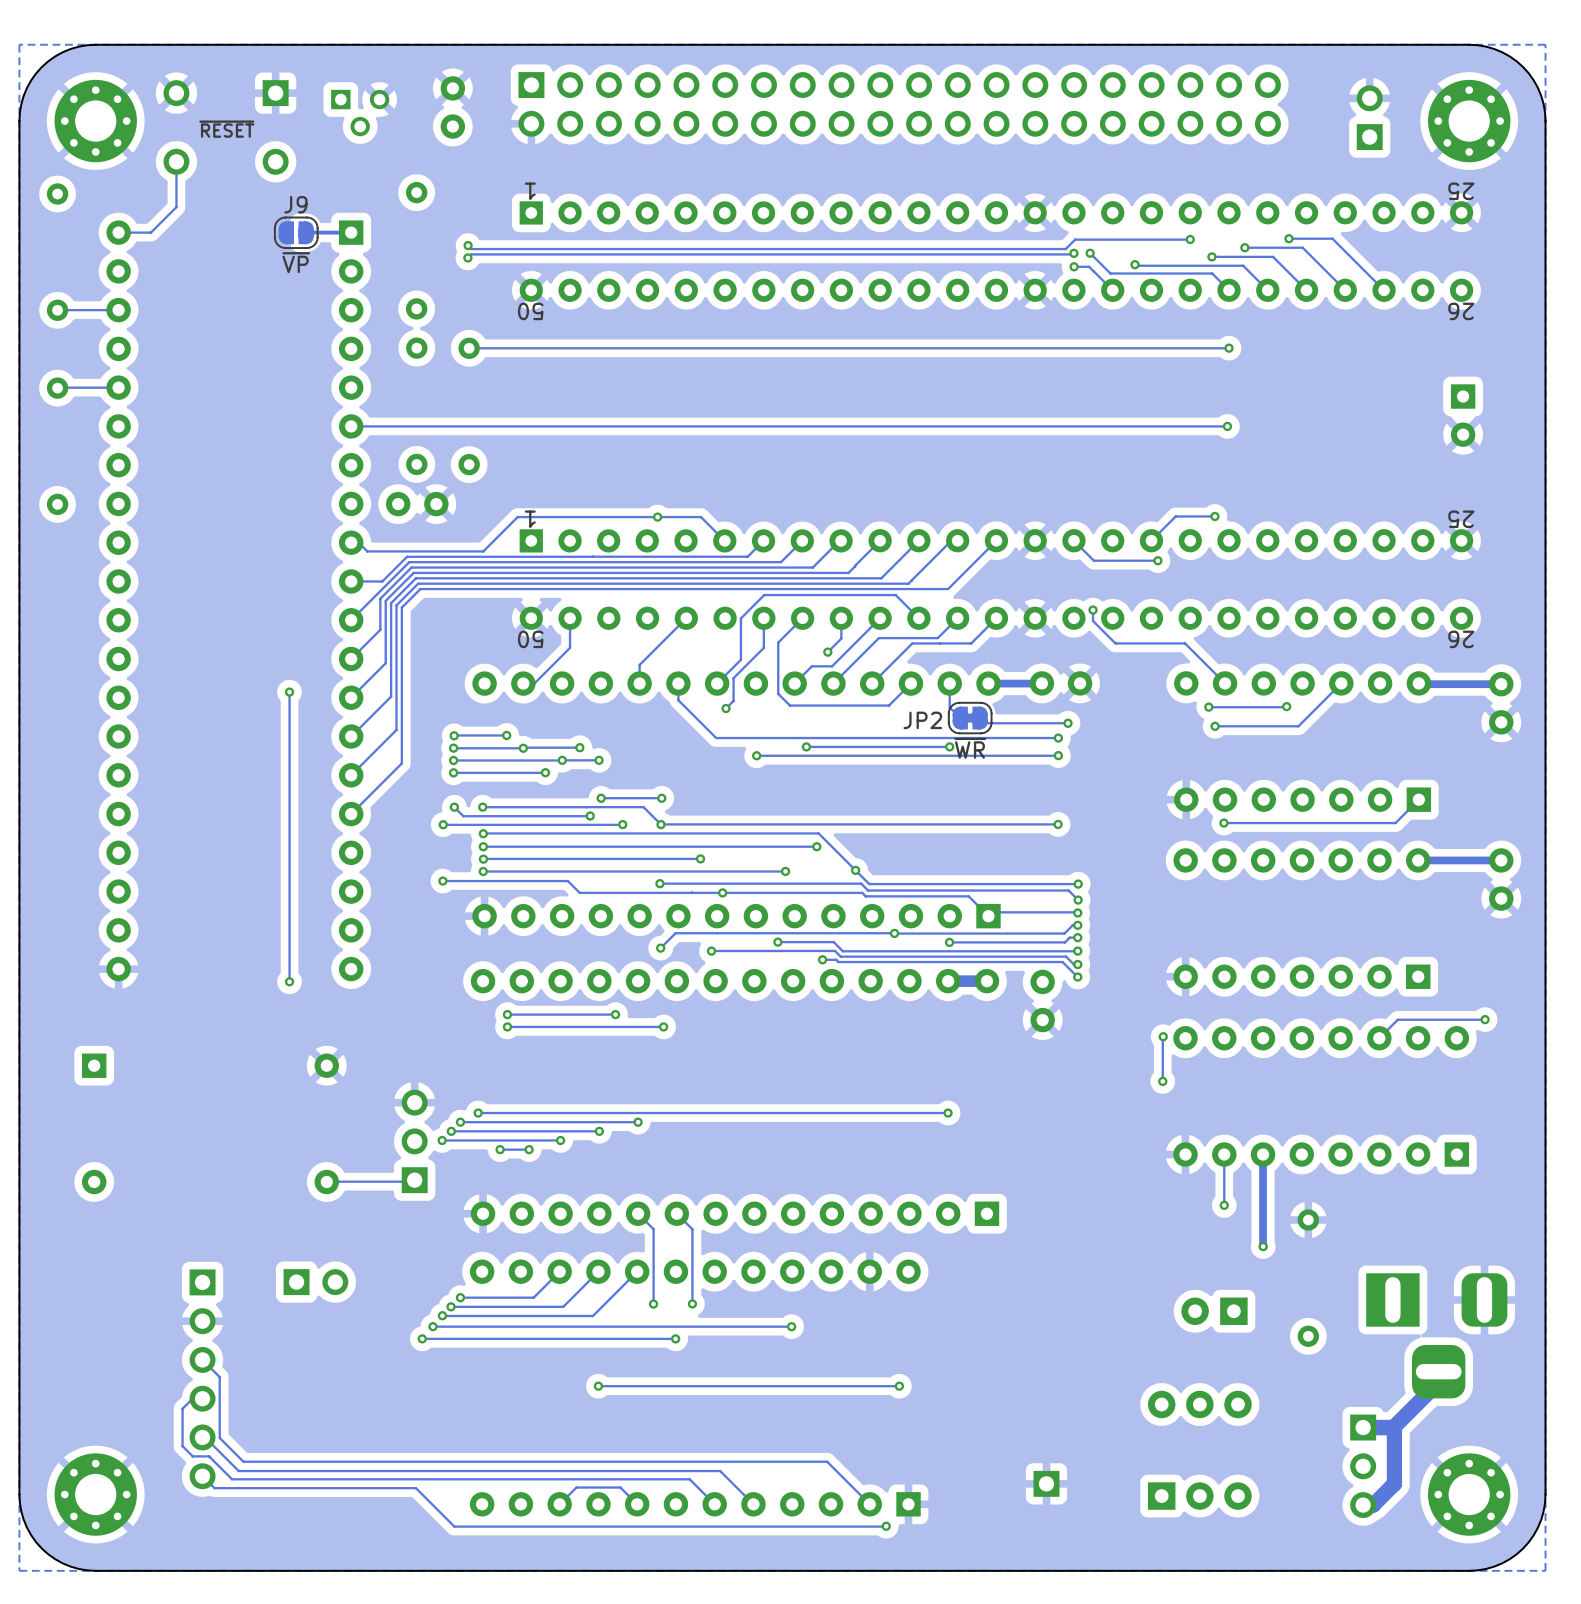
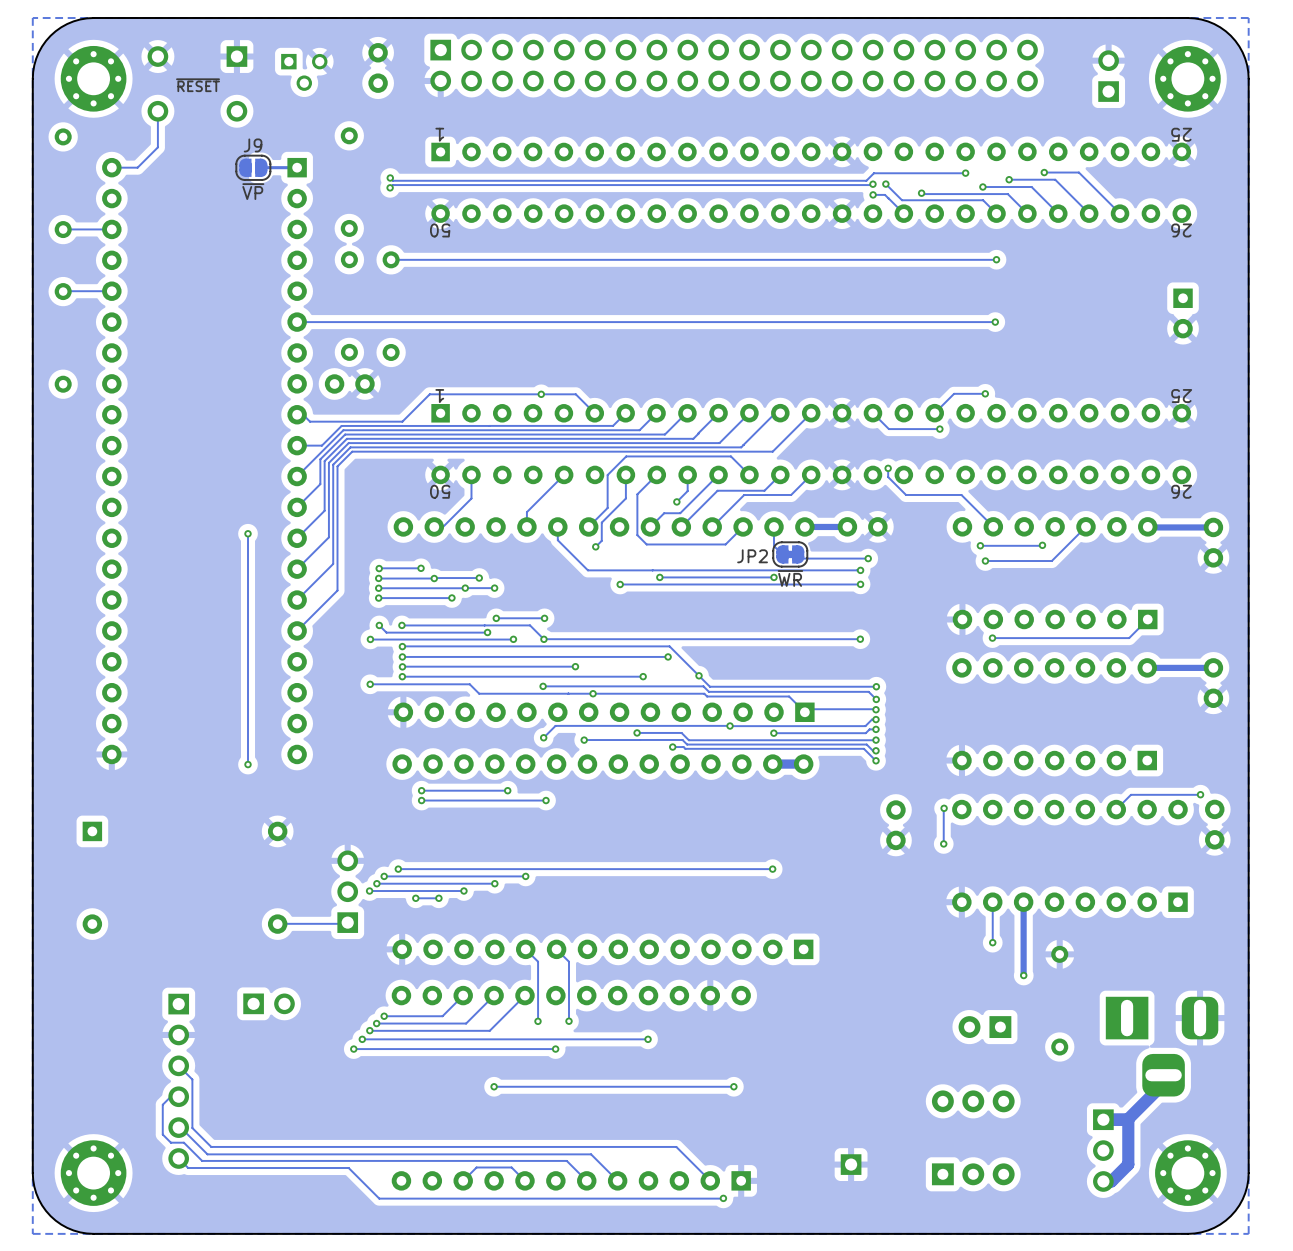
part position: (1042, 1001) -> (895, 825)
part: none -> (1214, 824)

